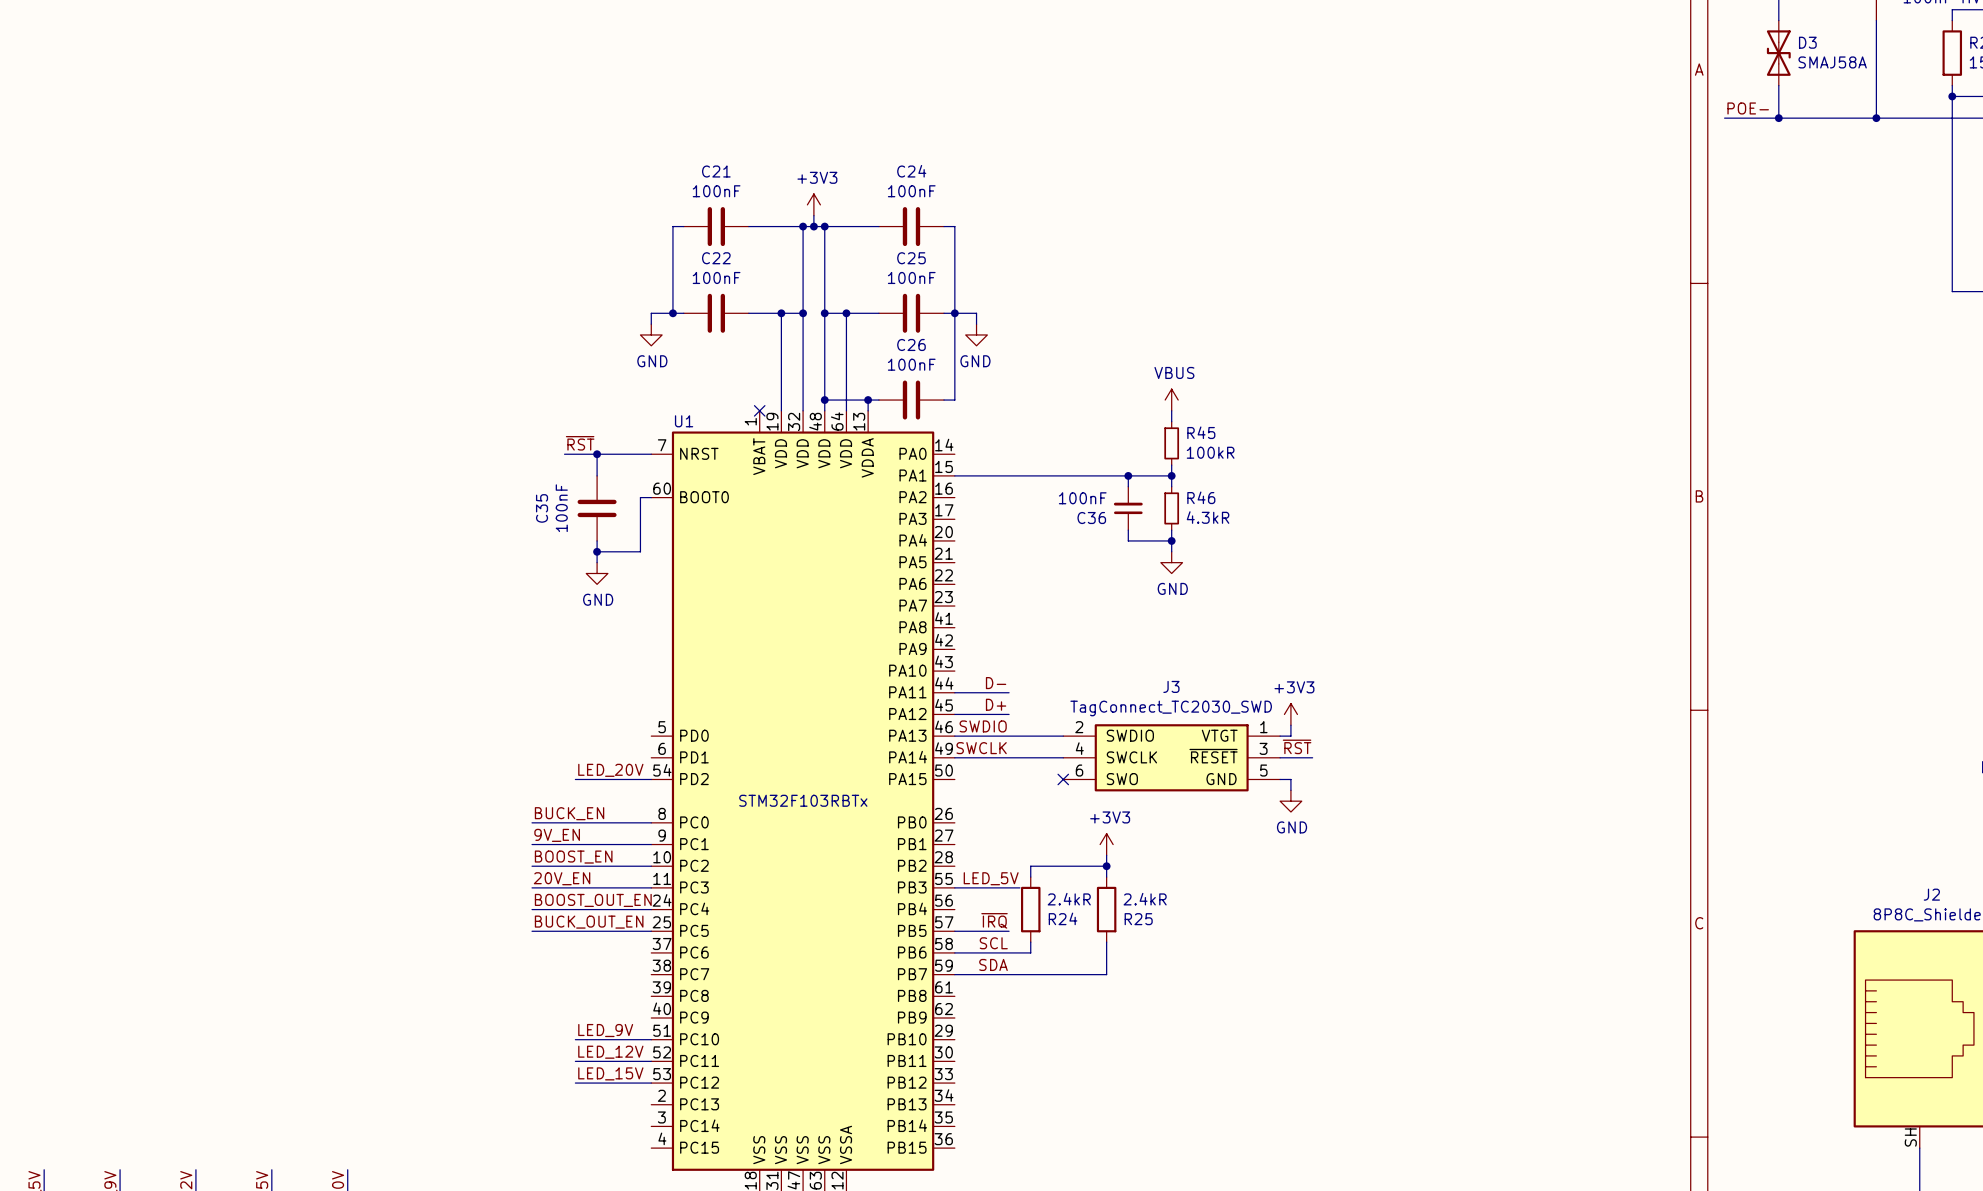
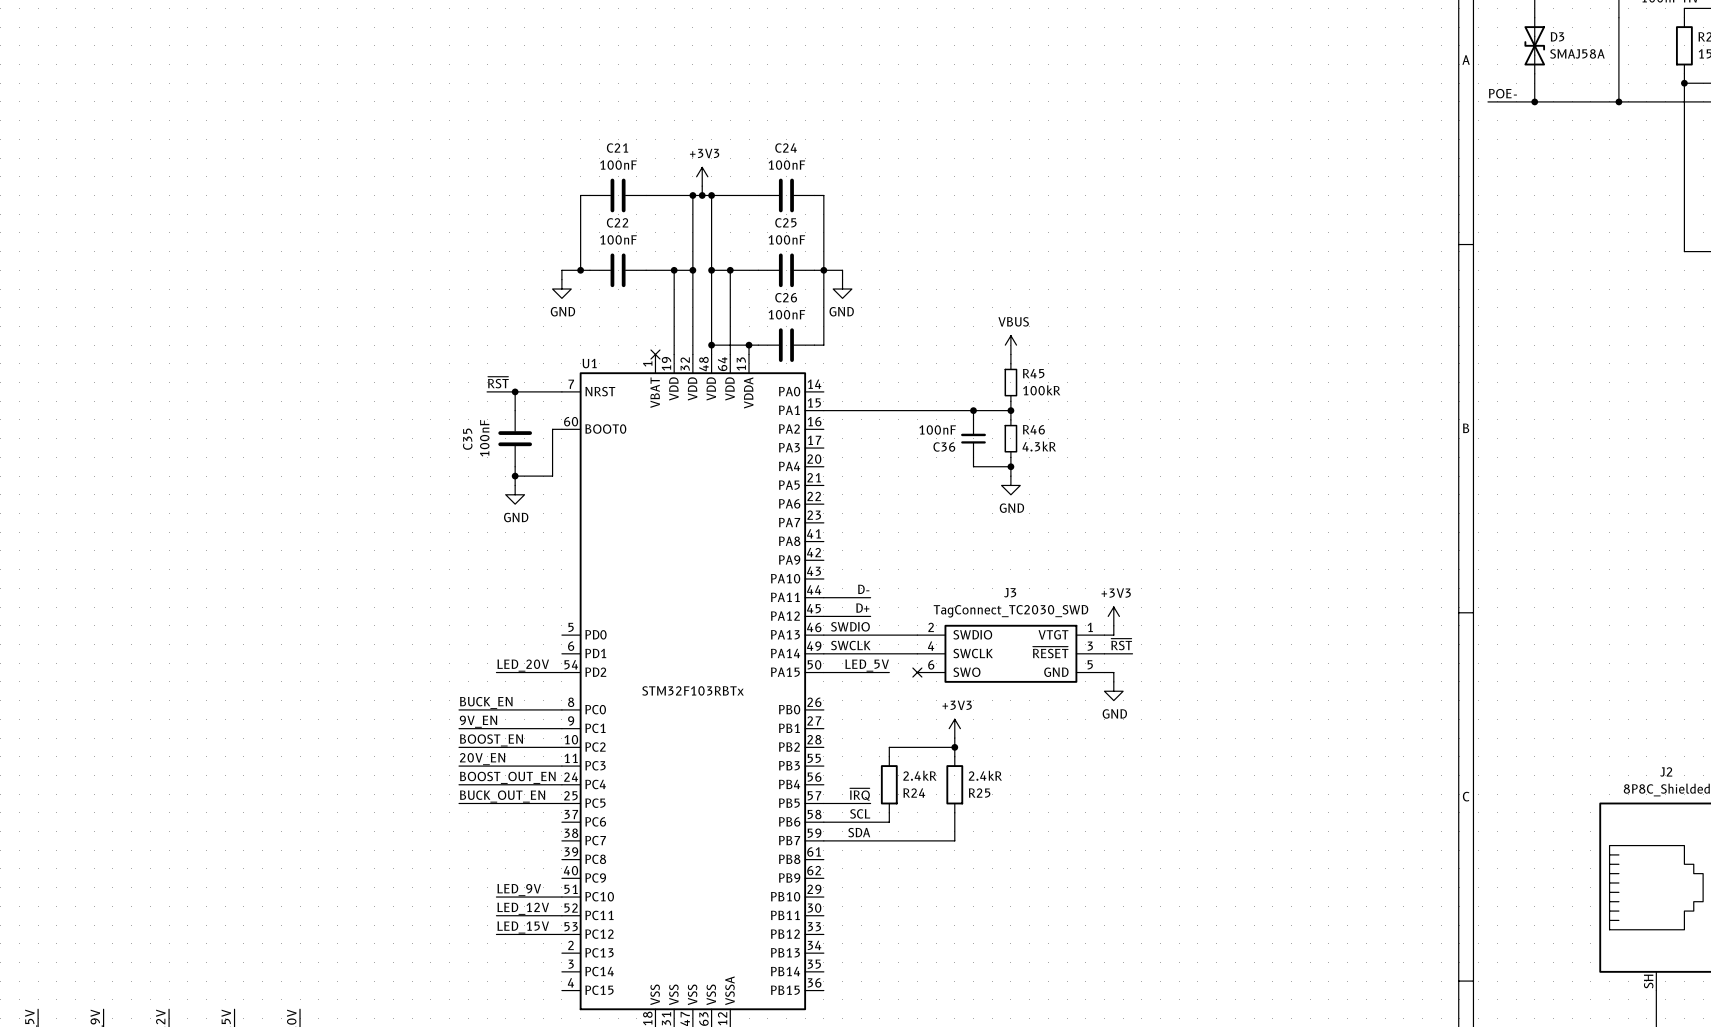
wire: none -> (823, 672) (889, 672)
label position: LED_5V (991, 878) -> LED_5V (867, 665)
wire: (954, 887) (1019, 887) -> none

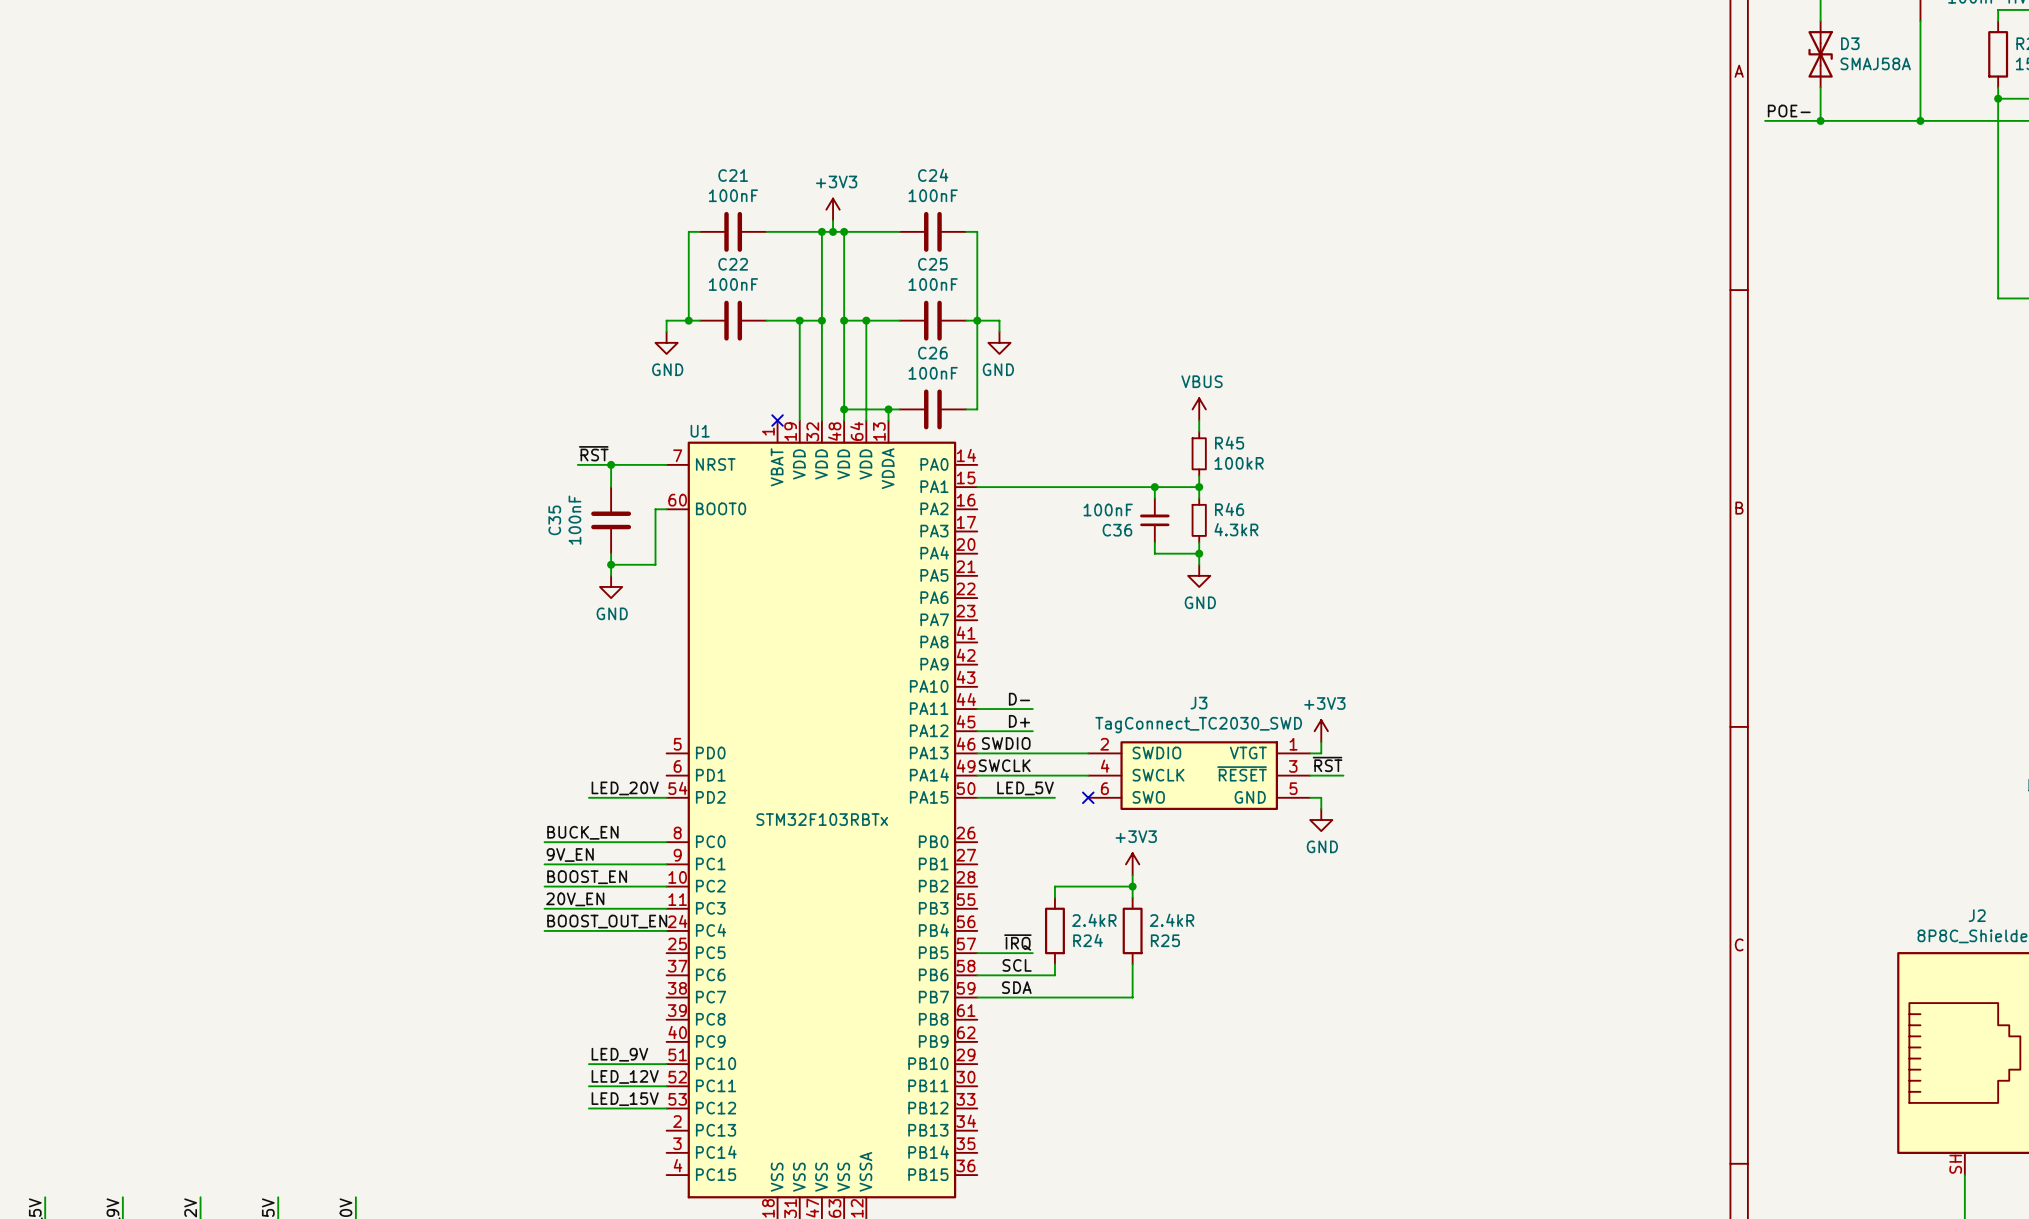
label: BUCK_OUT_EN (502, 796) -> none
wire: (459, 803) (561, 803) -> none

